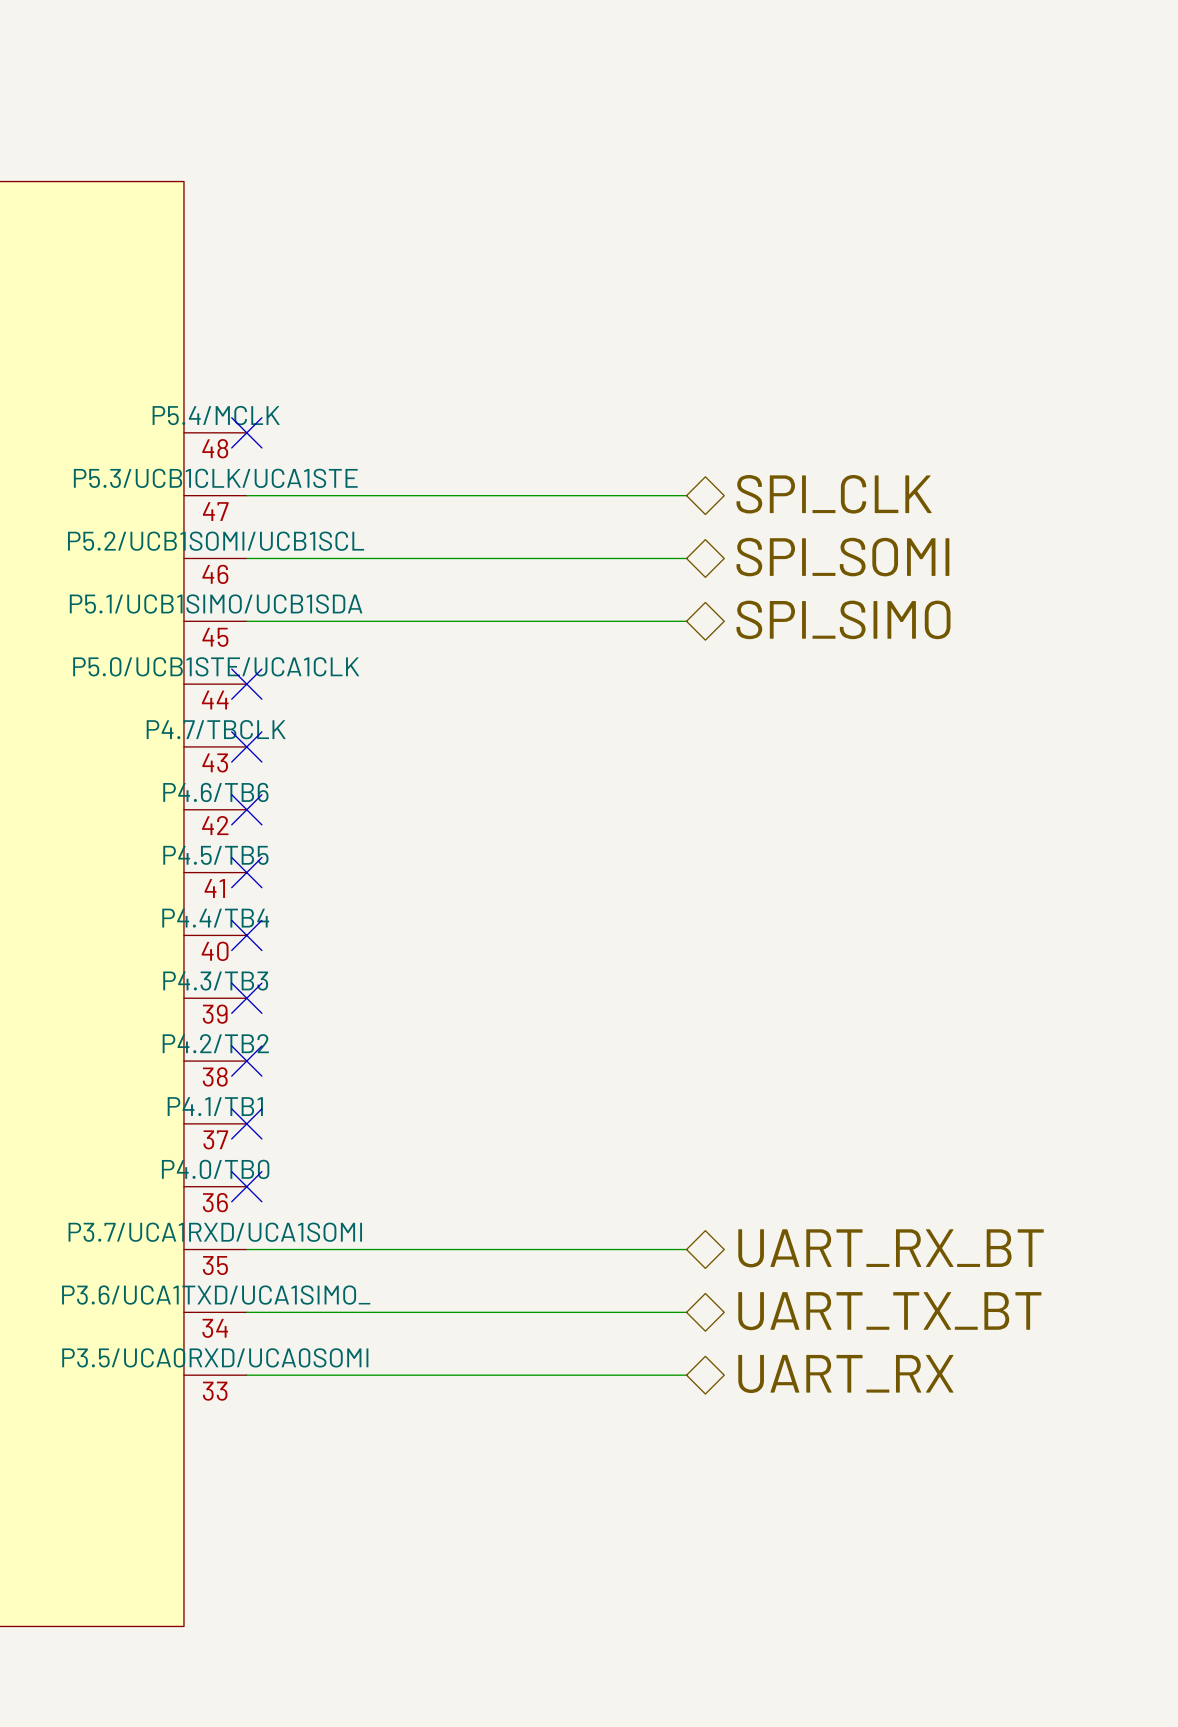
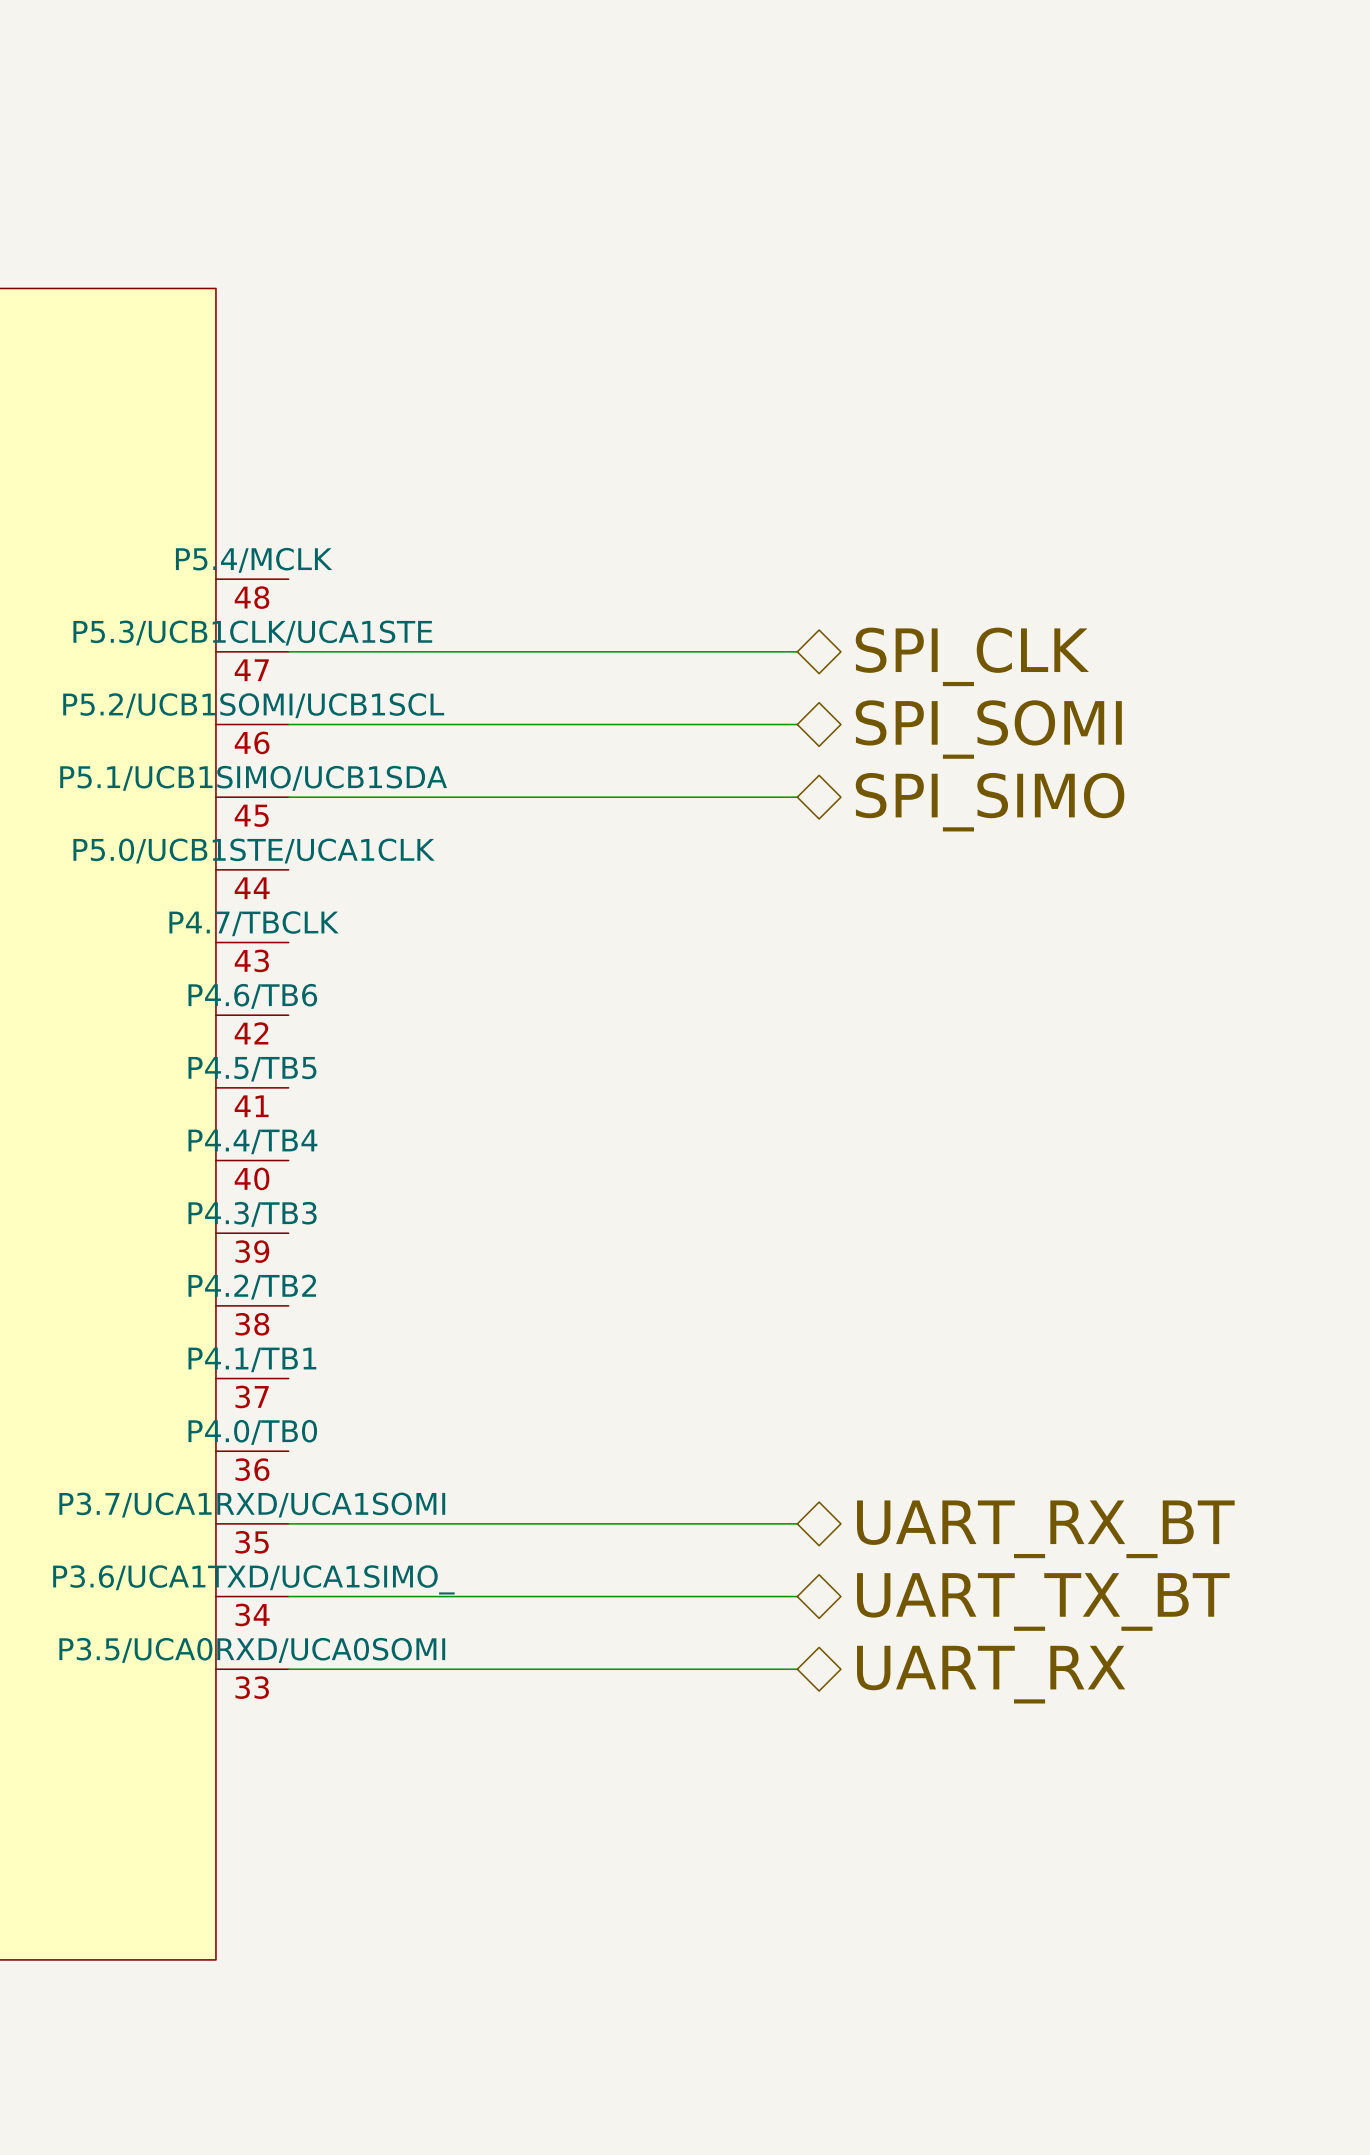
no-connect mark: (246, 432) -> none
no-connect mark: (246, 684) -> none
no-connect mark: (246, 746) -> none
no-connect mark: (246, 809) -> none
no-connect mark: (246, 872) -> none
no-connect mark: (246, 935) -> none
no-connect mark: (246, 998) -> none
no-connect mark: (246, 1061) -> none
no-connect mark: (246, 1123) -> none
no-connect mark: (246, 1186) -> none

